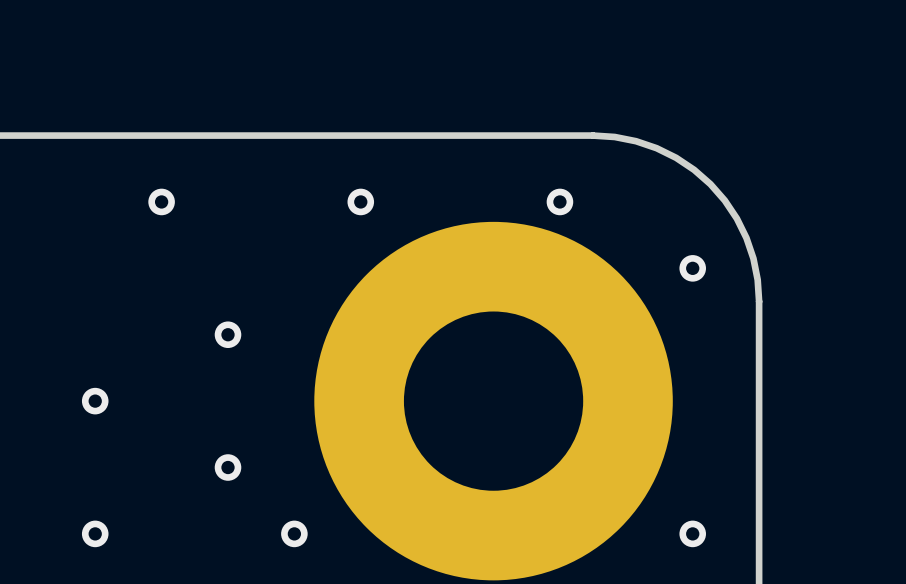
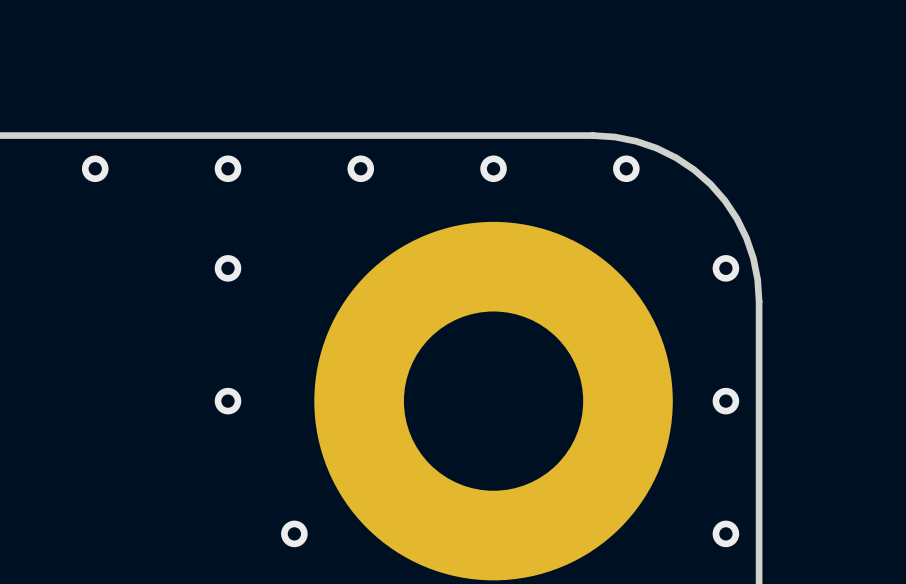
via: none -> (95, 168)
via: none -> (228, 168)
via: none -> (493, 168)
via: none -> (626, 168)
via: (161, 201) -> none
via position: (360, 201) -> (360, 168)
via: (559, 201) -> none
via: none -> (228, 268)
via position: (692, 268) -> (725, 268)
via: (228, 334) -> none
via: (95, 401) -> none
via: none -> (228, 401)
via: none -> (725, 401)
via: (228, 467) -> none
via: (95, 533) -> none
via position: (692, 533) -> (725, 533)

